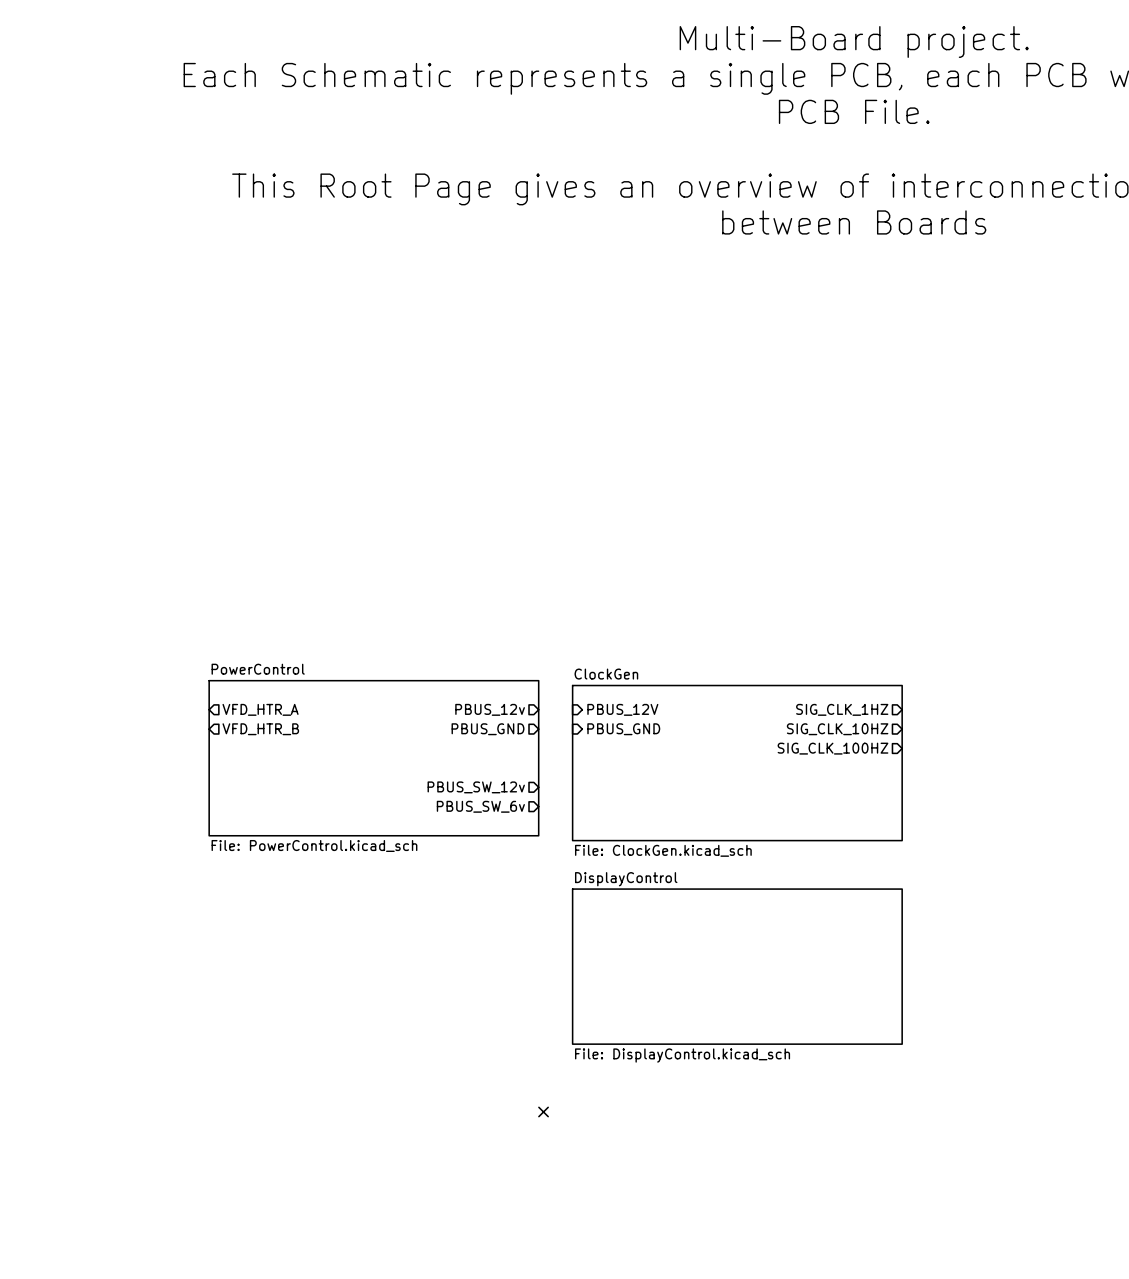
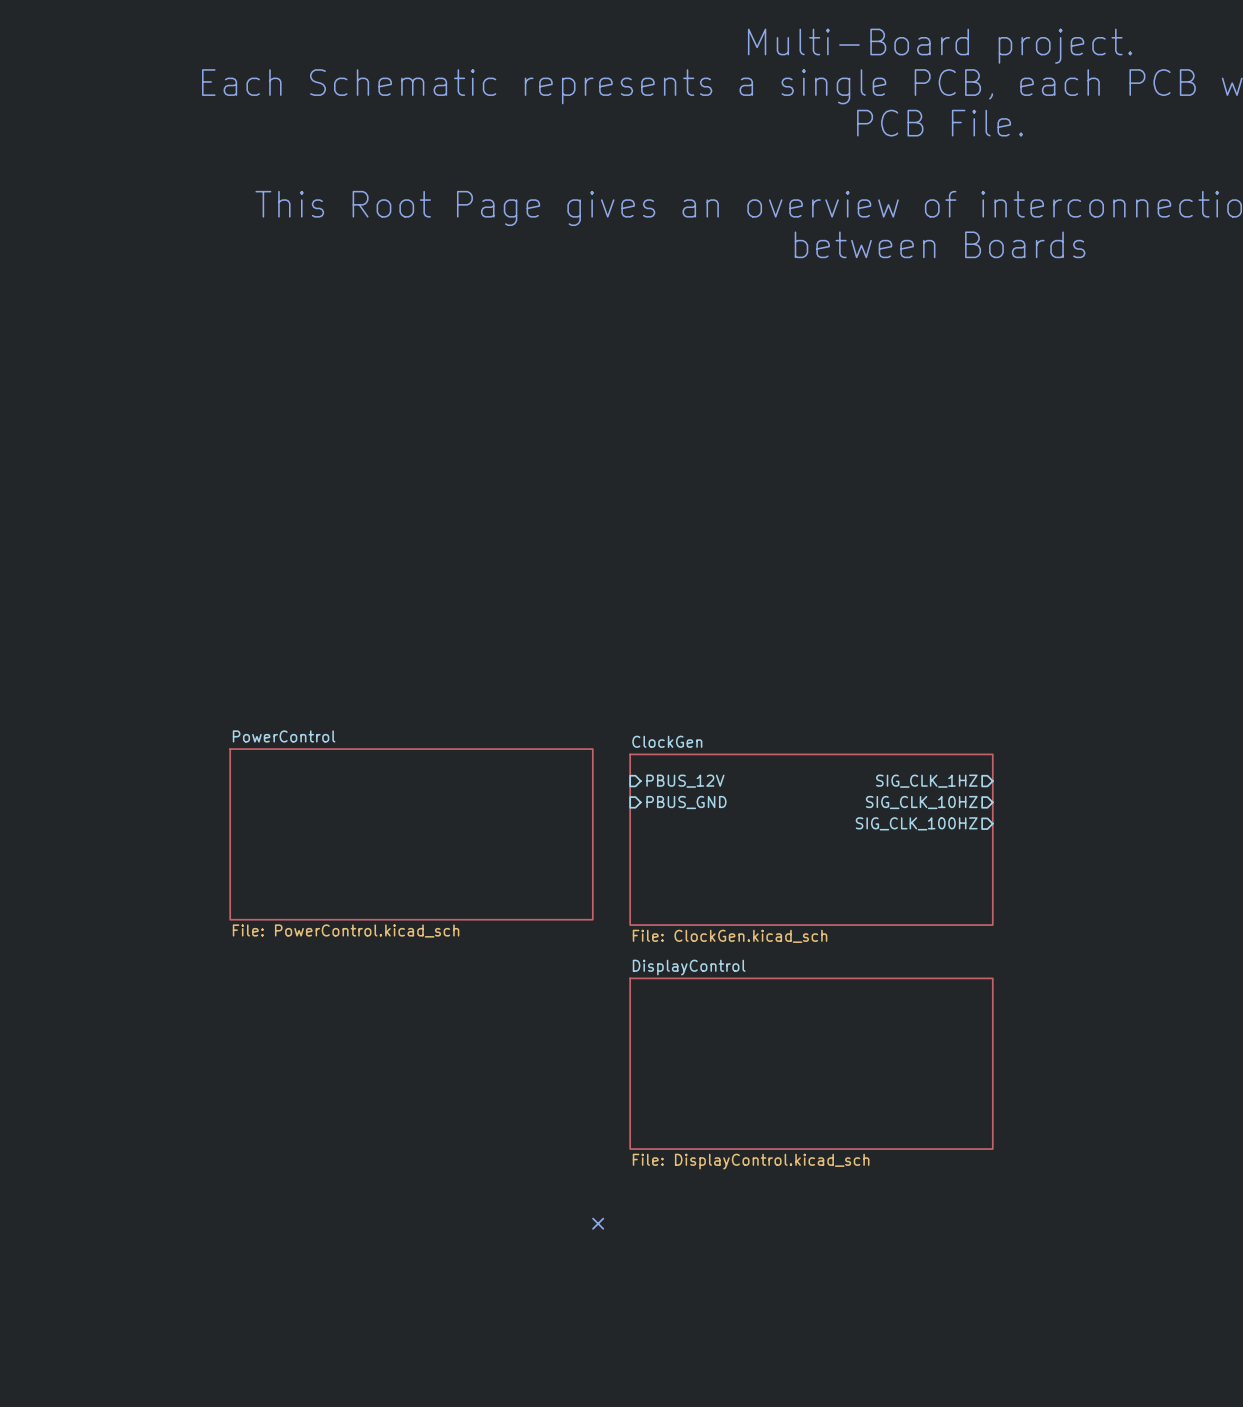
sheet pin: VFD_HTR_A (260, 709) -> none
sheet pin: PBUS_12v (490, 709) -> none
sheet pin: VFD_HTR_B (260, 729) -> none
sheet pin: PBUS_GND (488, 729) -> none
sheet pin: PBUS_SW_12v (476, 787) -> none
sheet pin: PBUS_SW_6v (480, 806) -> none

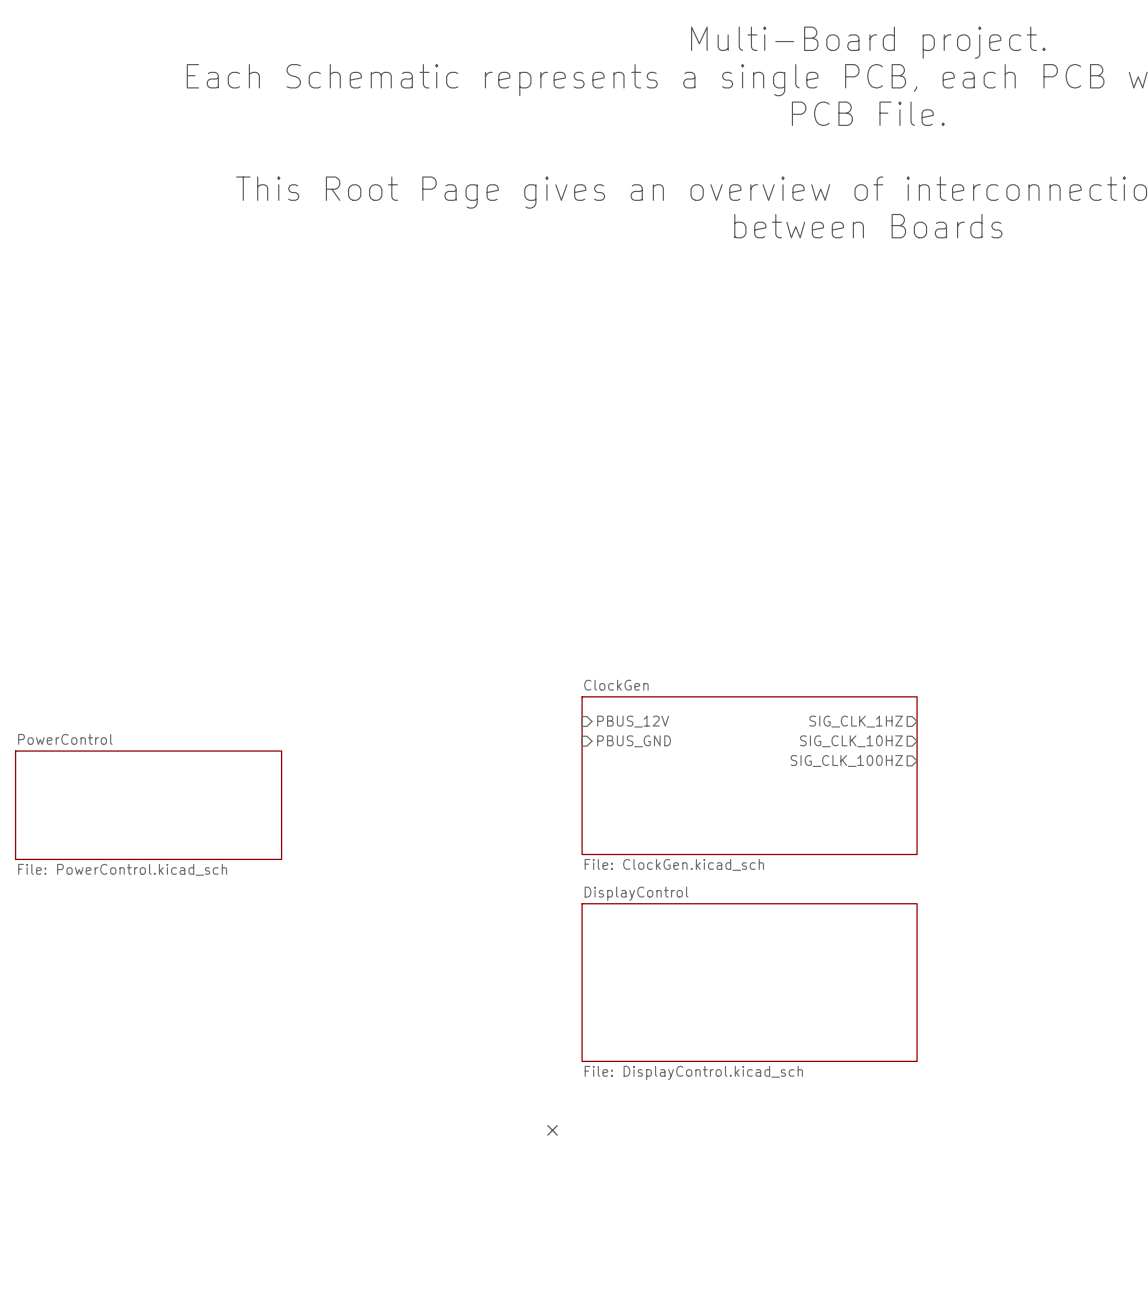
sheet PowerControl: File: PowerControl.kicad_sch (411, 834) -> none
sheet PowerControl: none -> File: PowerControl.kicad_sch (148, 805)

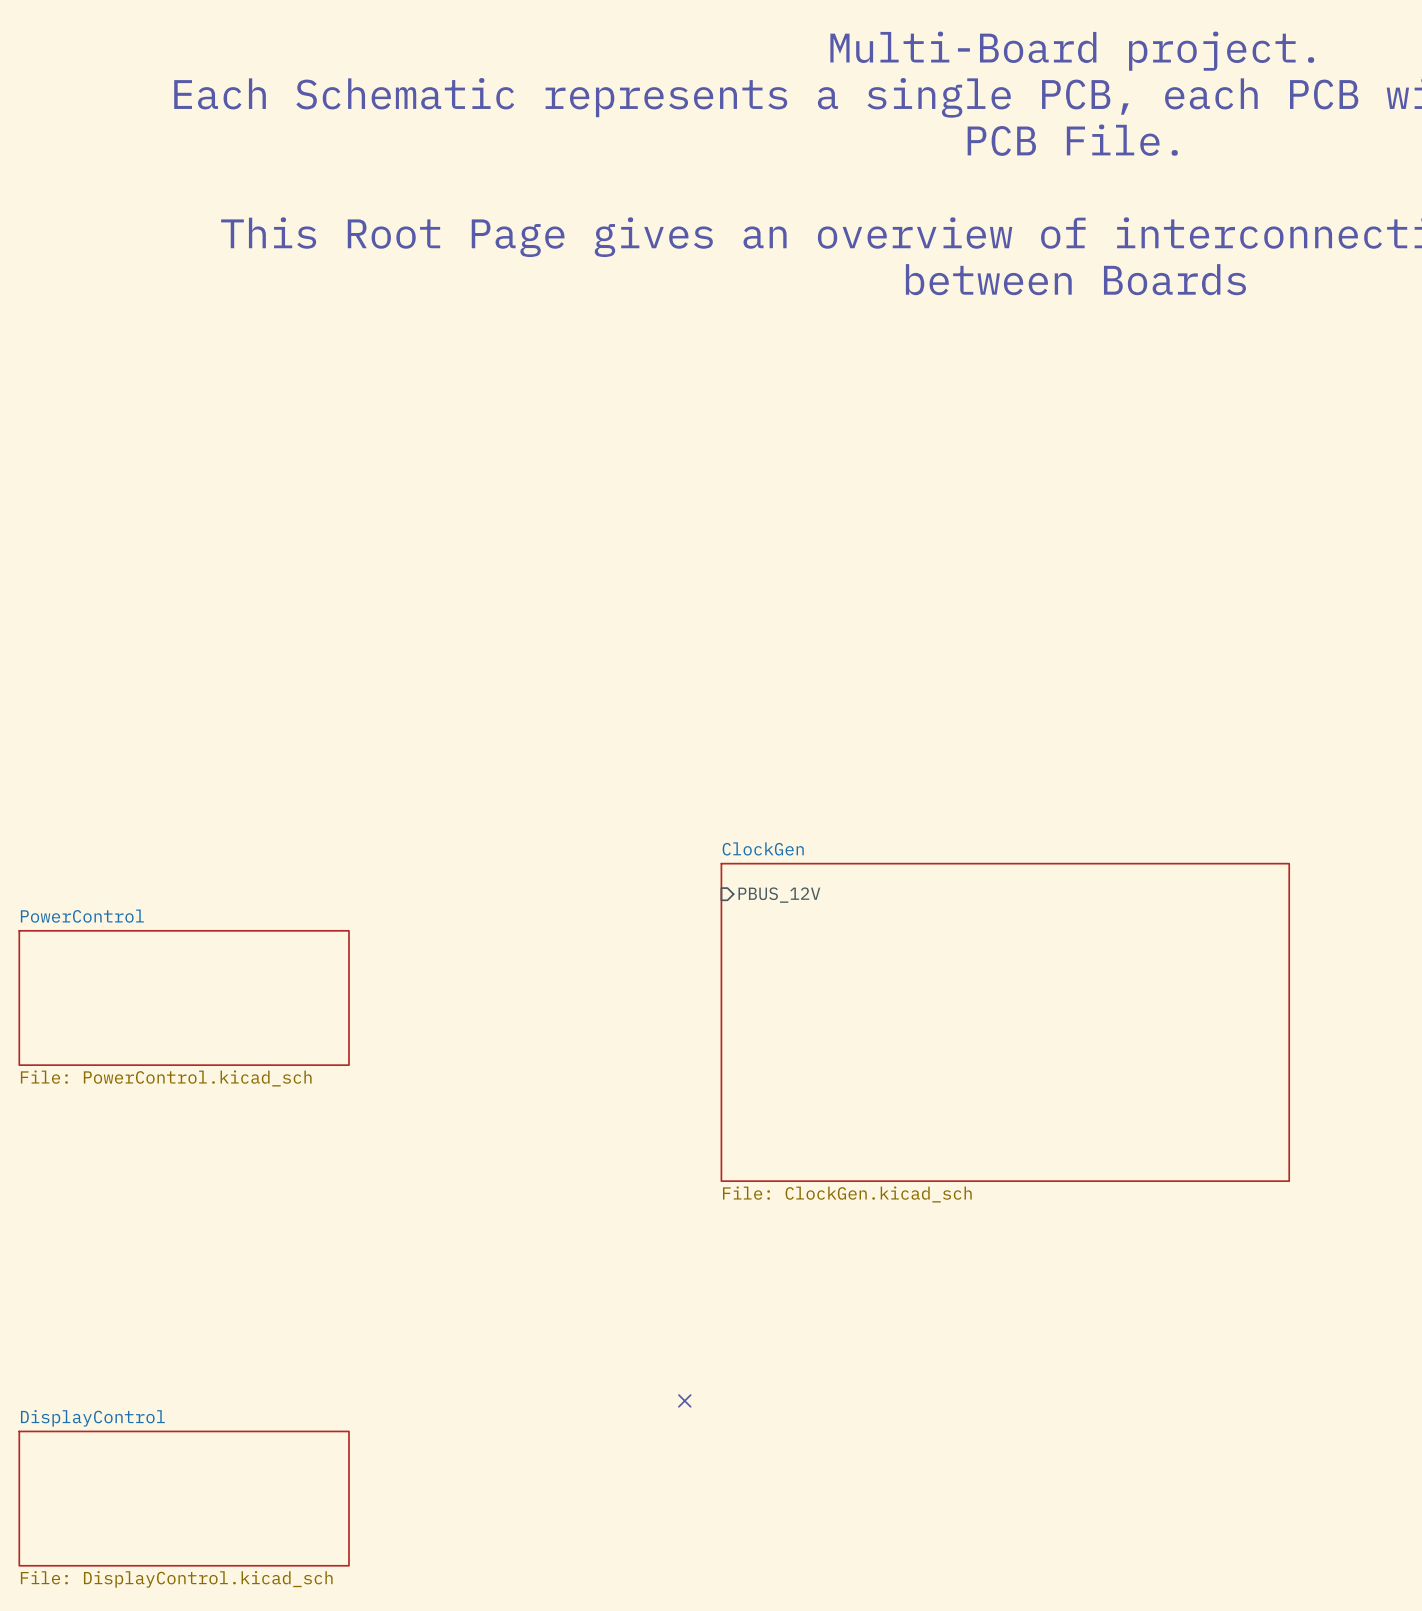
sheet pin: SIG_CLK_1HZ (856, 721) -> none
sheet pin: PBUS_GND (634, 741) -> none
sheet pin: SIG_CLK_10HZ (851, 741) -> none
sheet pin: SIG_CLK_100HZ (846, 761) -> none
sheet ClockGen: File: ClockGen.kicad_sch (749, 775) -> none
sheet ClockGen: none -> File: ClockGen.kicad_sch (1005, 1022)
sheet DisplayControl: File: DisplayControl.kicad_sch (749, 982) -> none
sheet DisplayControl: none -> File: DisplayControl.kicad_sch (184, 1498)

